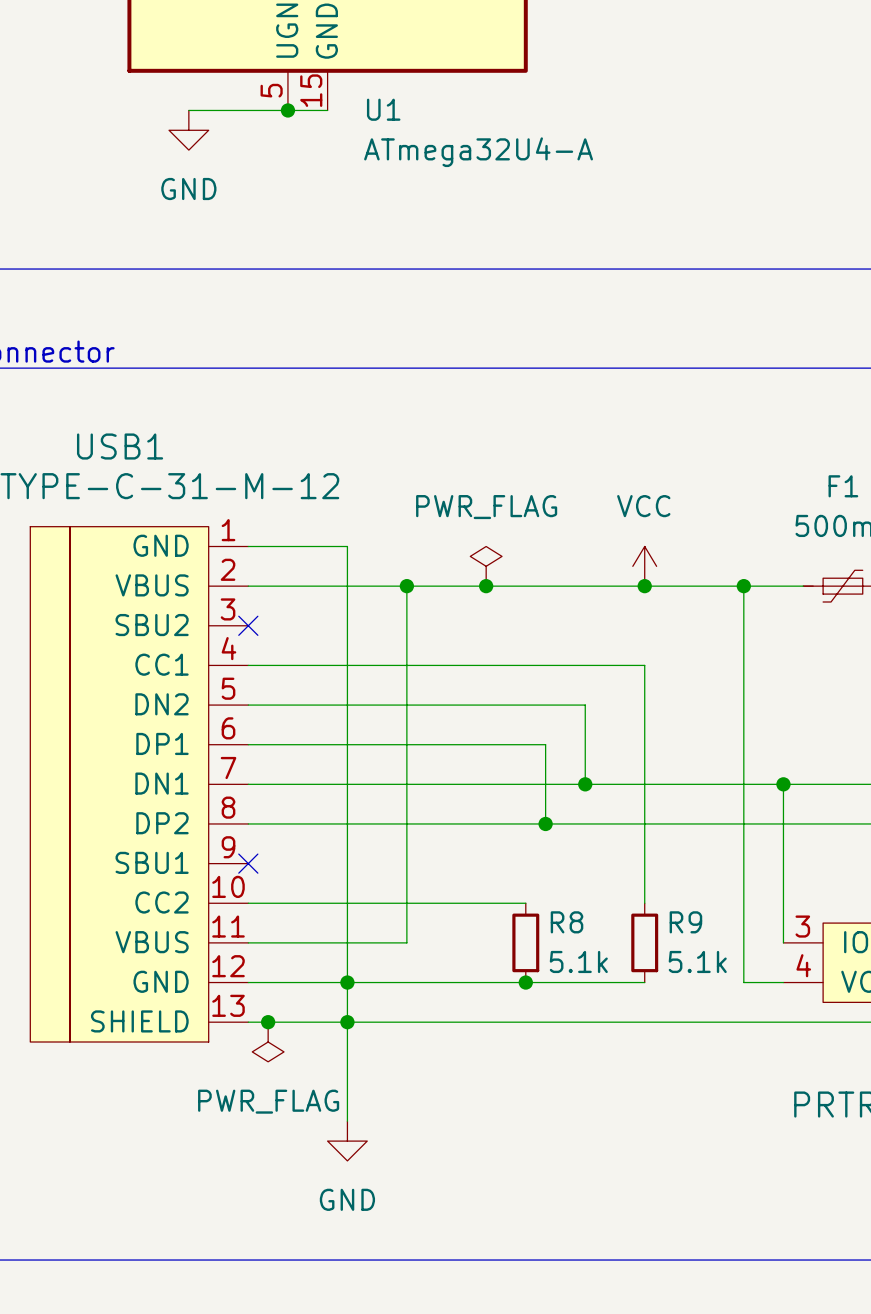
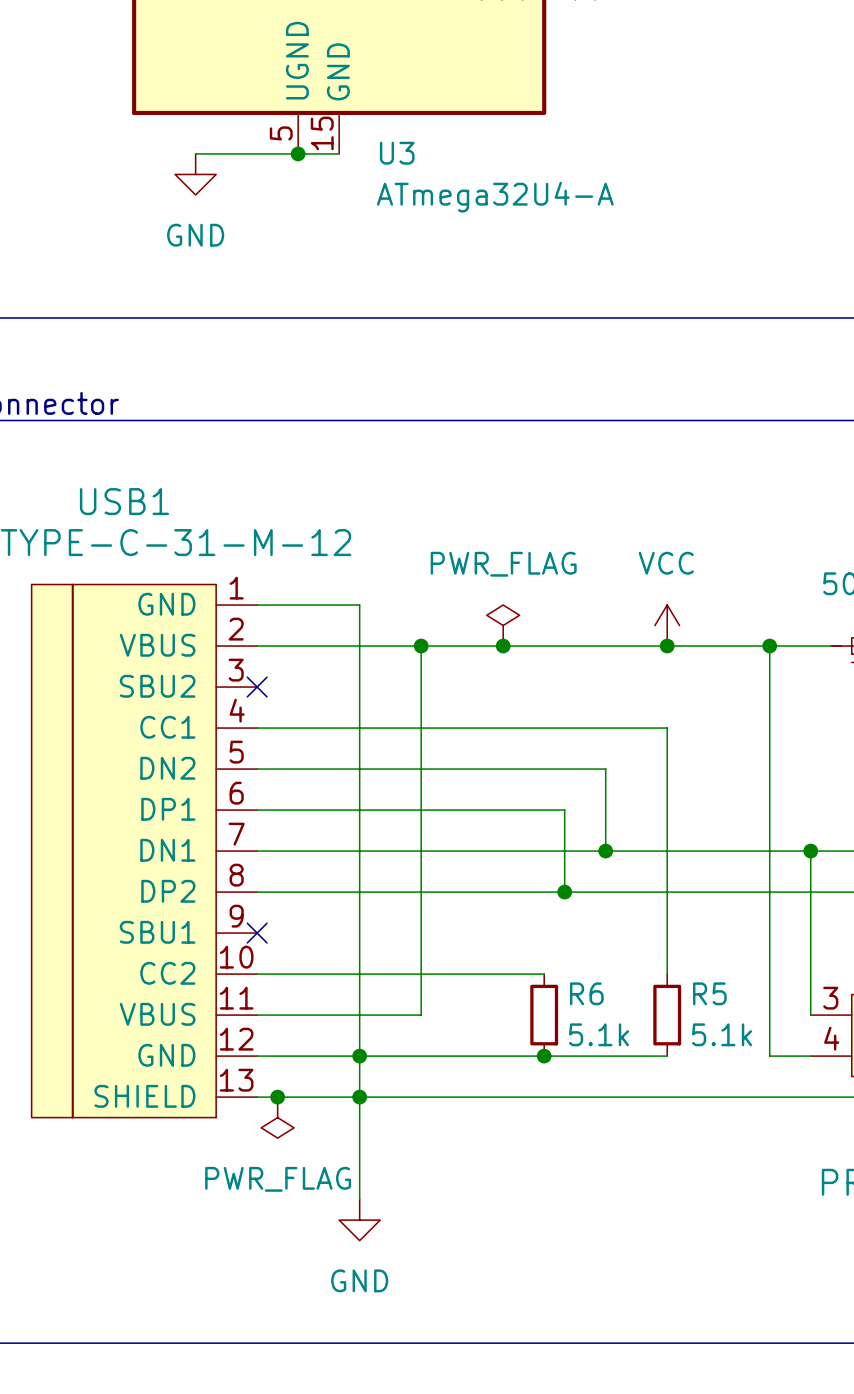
U1 name: U1 (383, 109) -> U3 (397, 153)
R8 name: R8 (567, 922) -> R6 (586, 993)
R9 name: R9 (685, 922) -> R5 (709, 993)

